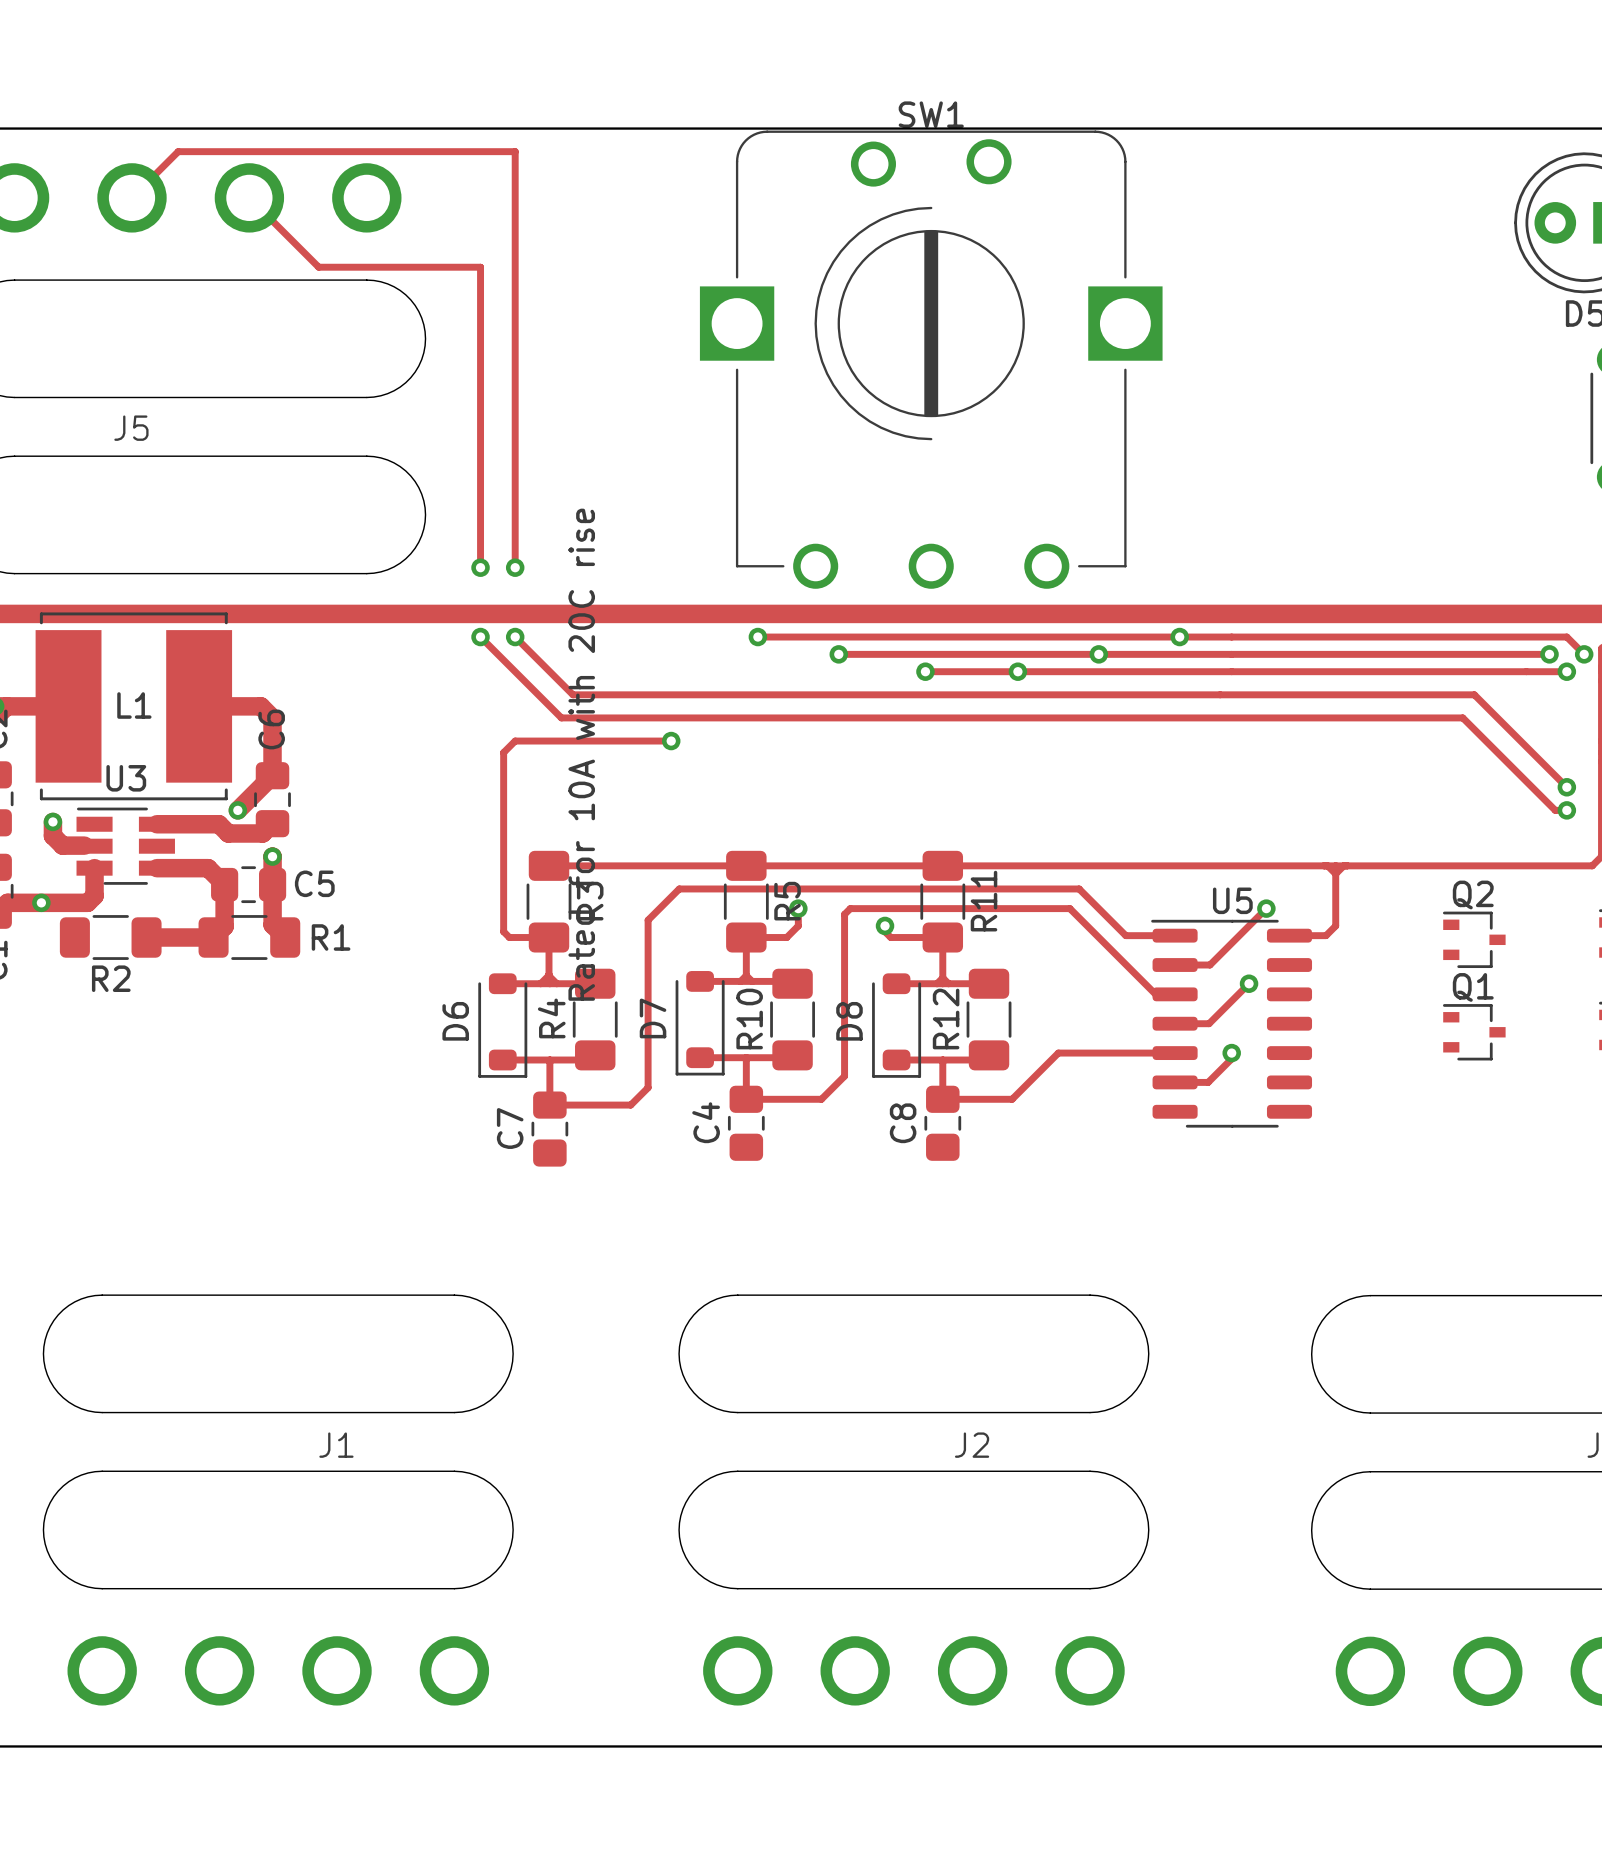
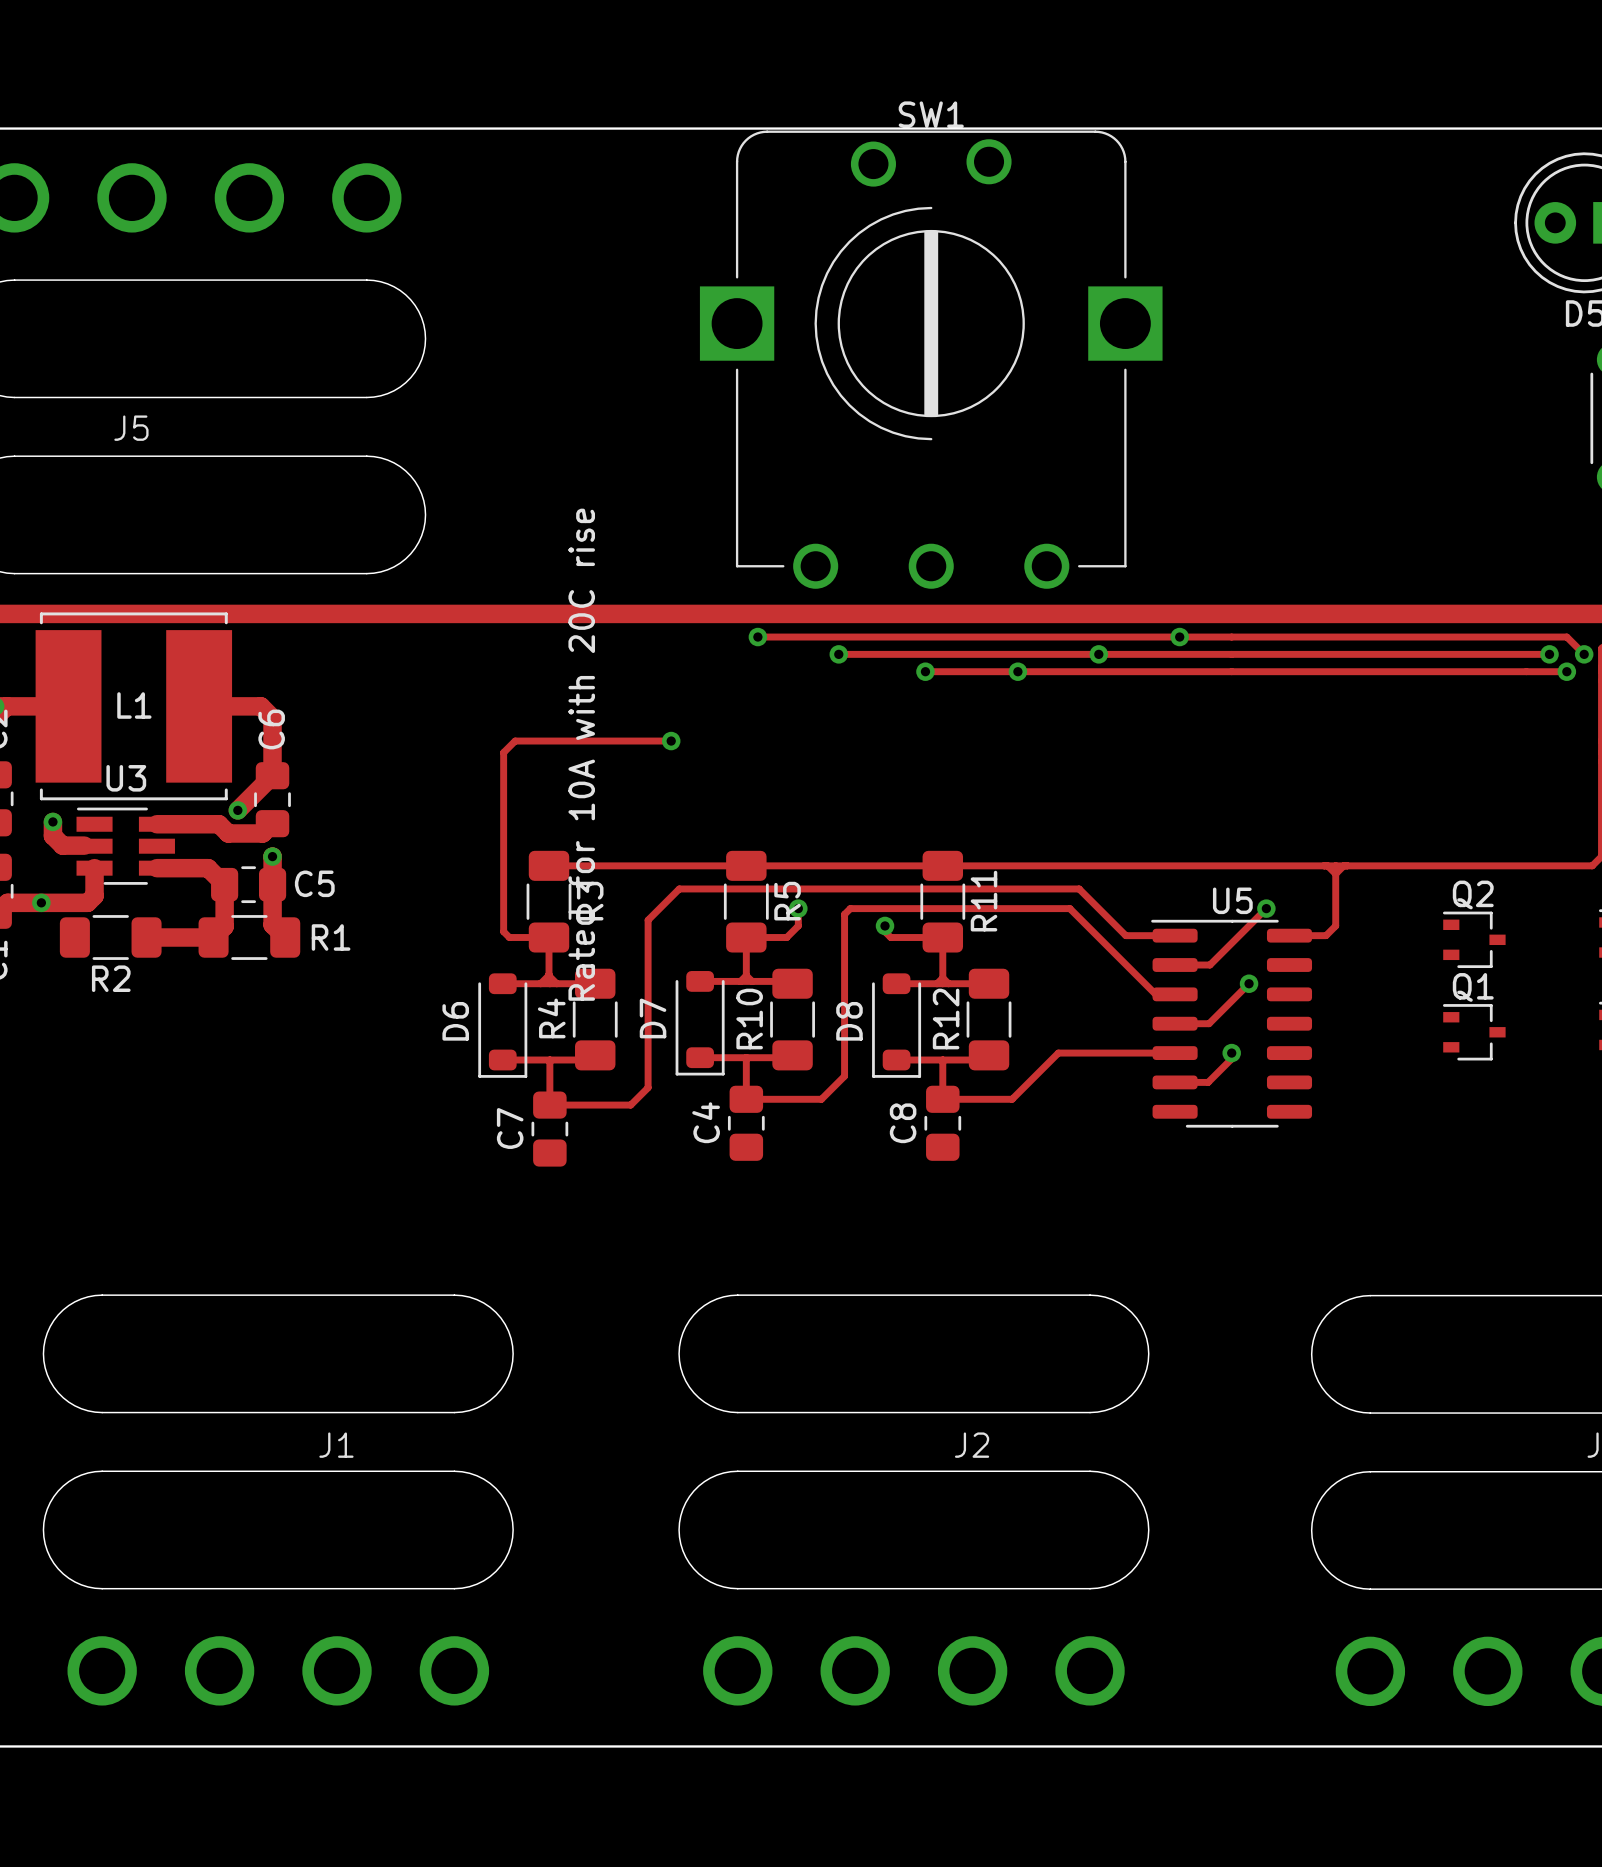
track: (131, 197) (178, 151) (515, 151) (515, 567) -> none
track: (249, 197) (318, 267) (480, 267) (480, 567) -> none
via: (480, 567) -> none
via: (515, 567) -> none
track: (480, 637) (561, 717) (1462, 717) (1555, 810) (1566, 810) -> none
via: (480, 637) -> none
track: (515, 637) (572, 694) (1474, 694) (1566, 787) -> none
via: (515, 637) -> none
via: (1566, 787) -> none
via: (1566, 810) -> none

